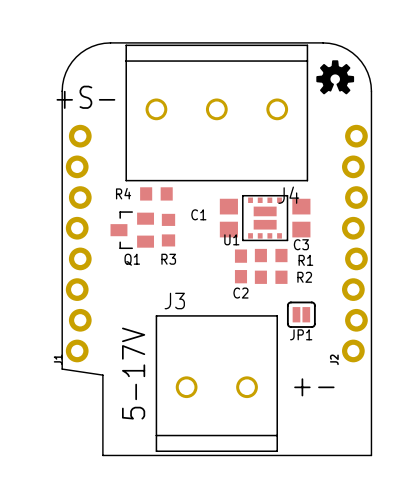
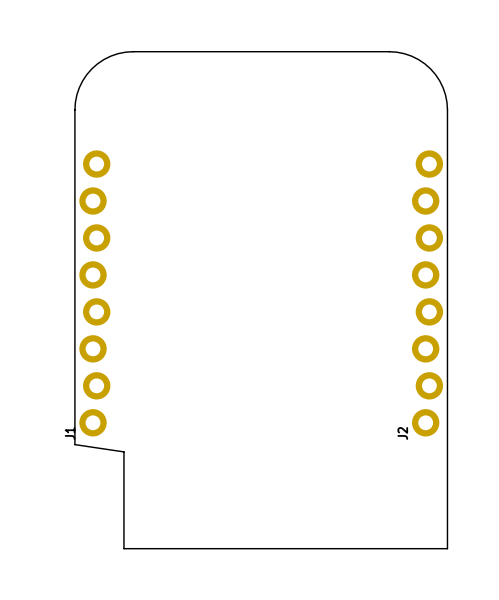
drawing: [316, 60, 355, 95] -> none
text: +S- (85, 97) -> none
J4: (216, 112) -> none
R4: (156, 193) -> none
C1: (228, 218) -> none
U1: (265, 218) -> none
C3: (301, 218) -> none
Q1: (132, 230) -> none
R3: (168, 230) -> none
R1: (271, 255) -> none
C2: (240, 266) -> none
R2: (271, 277) -> none
JP1: (301, 314) -> none
text: 5-17V (133, 373) -> none
J3: (216, 383) -> none
text: +- (314, 387) -> none

